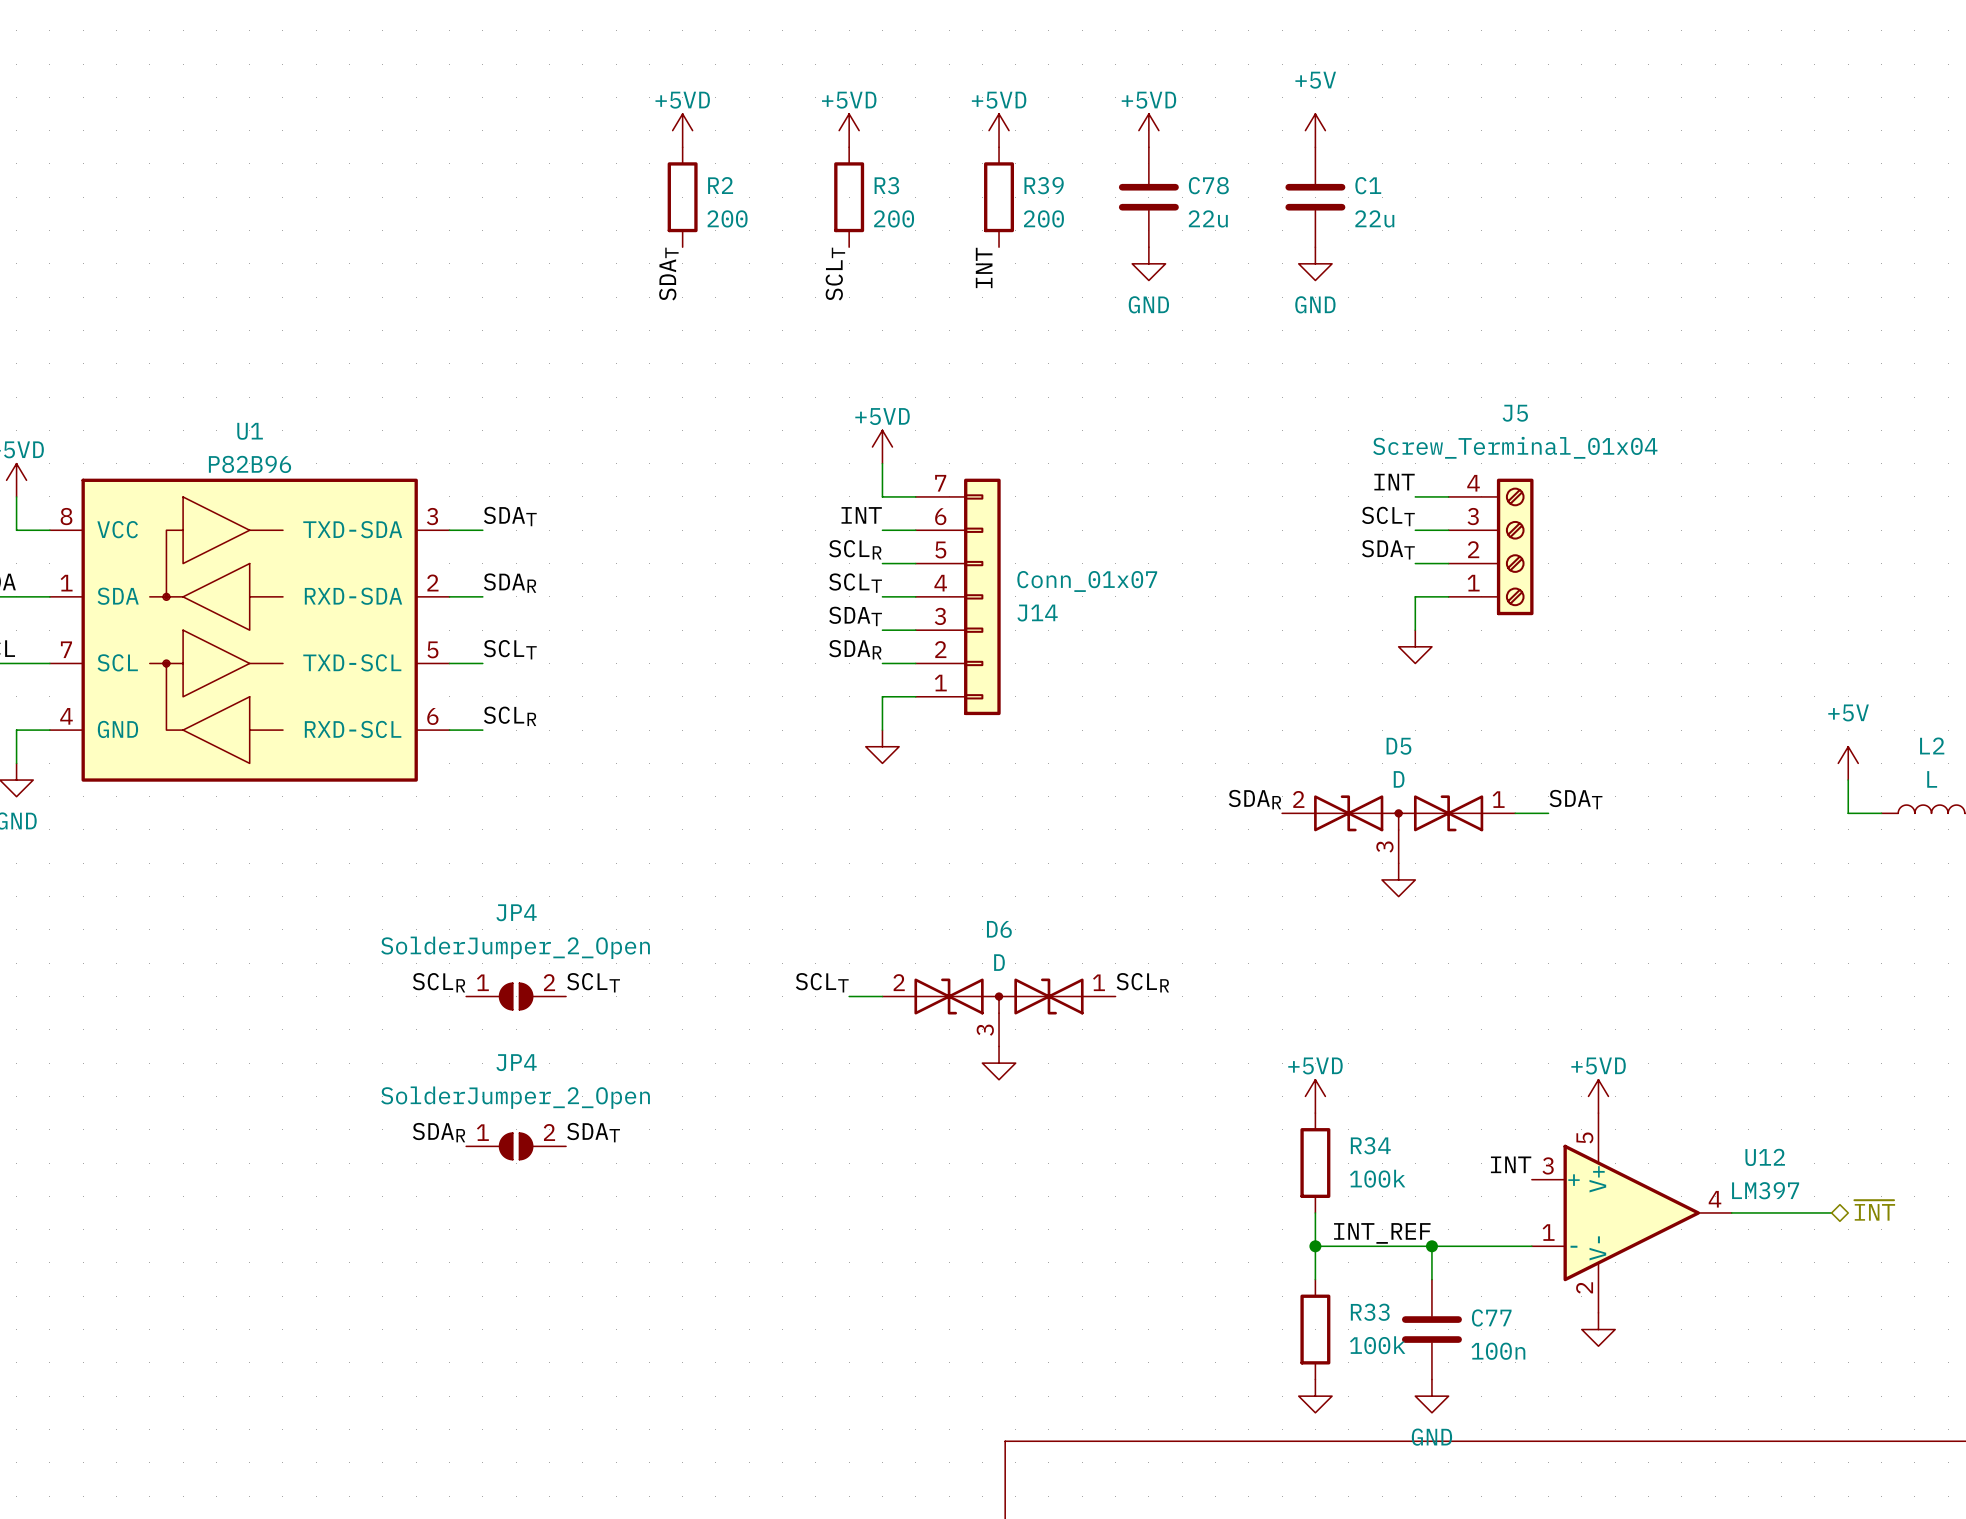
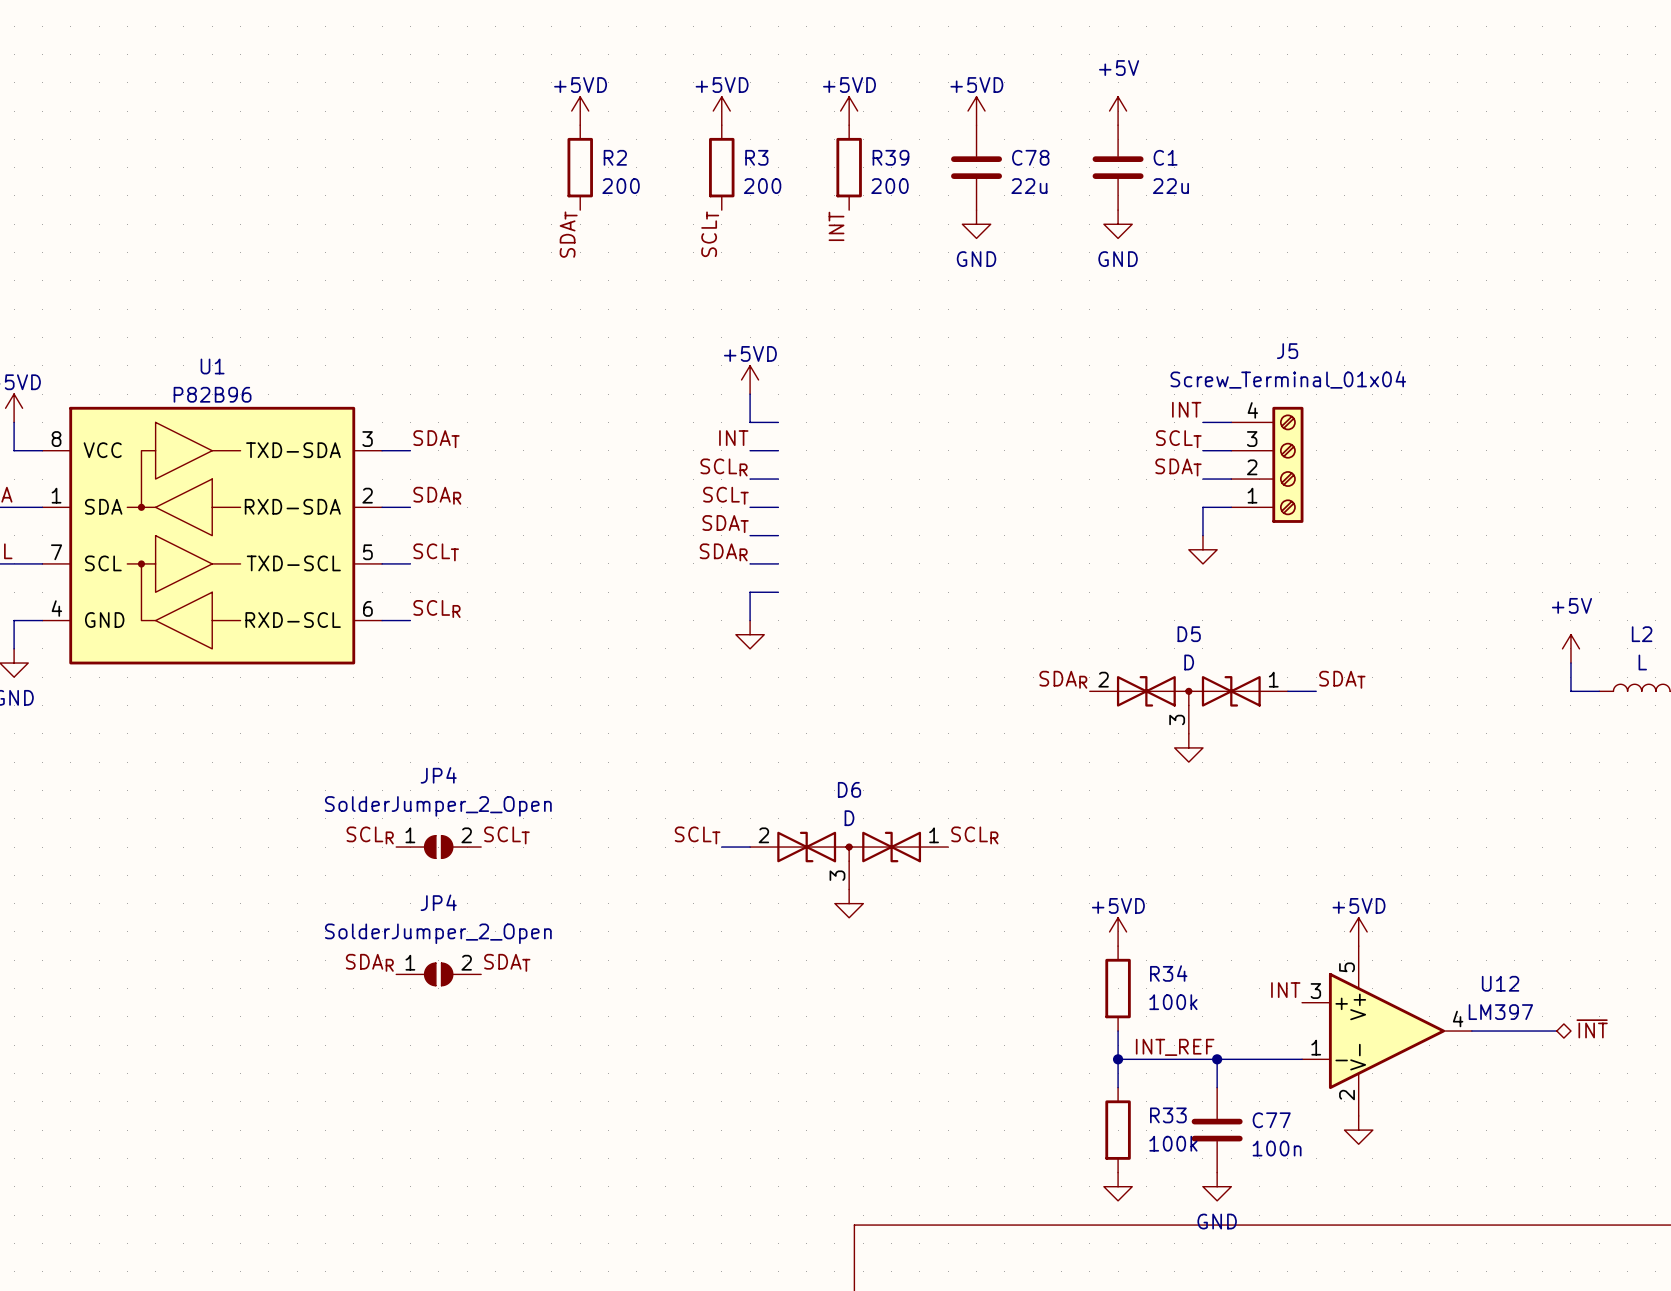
J14: Conn_01x07 (958, 596) -> none

